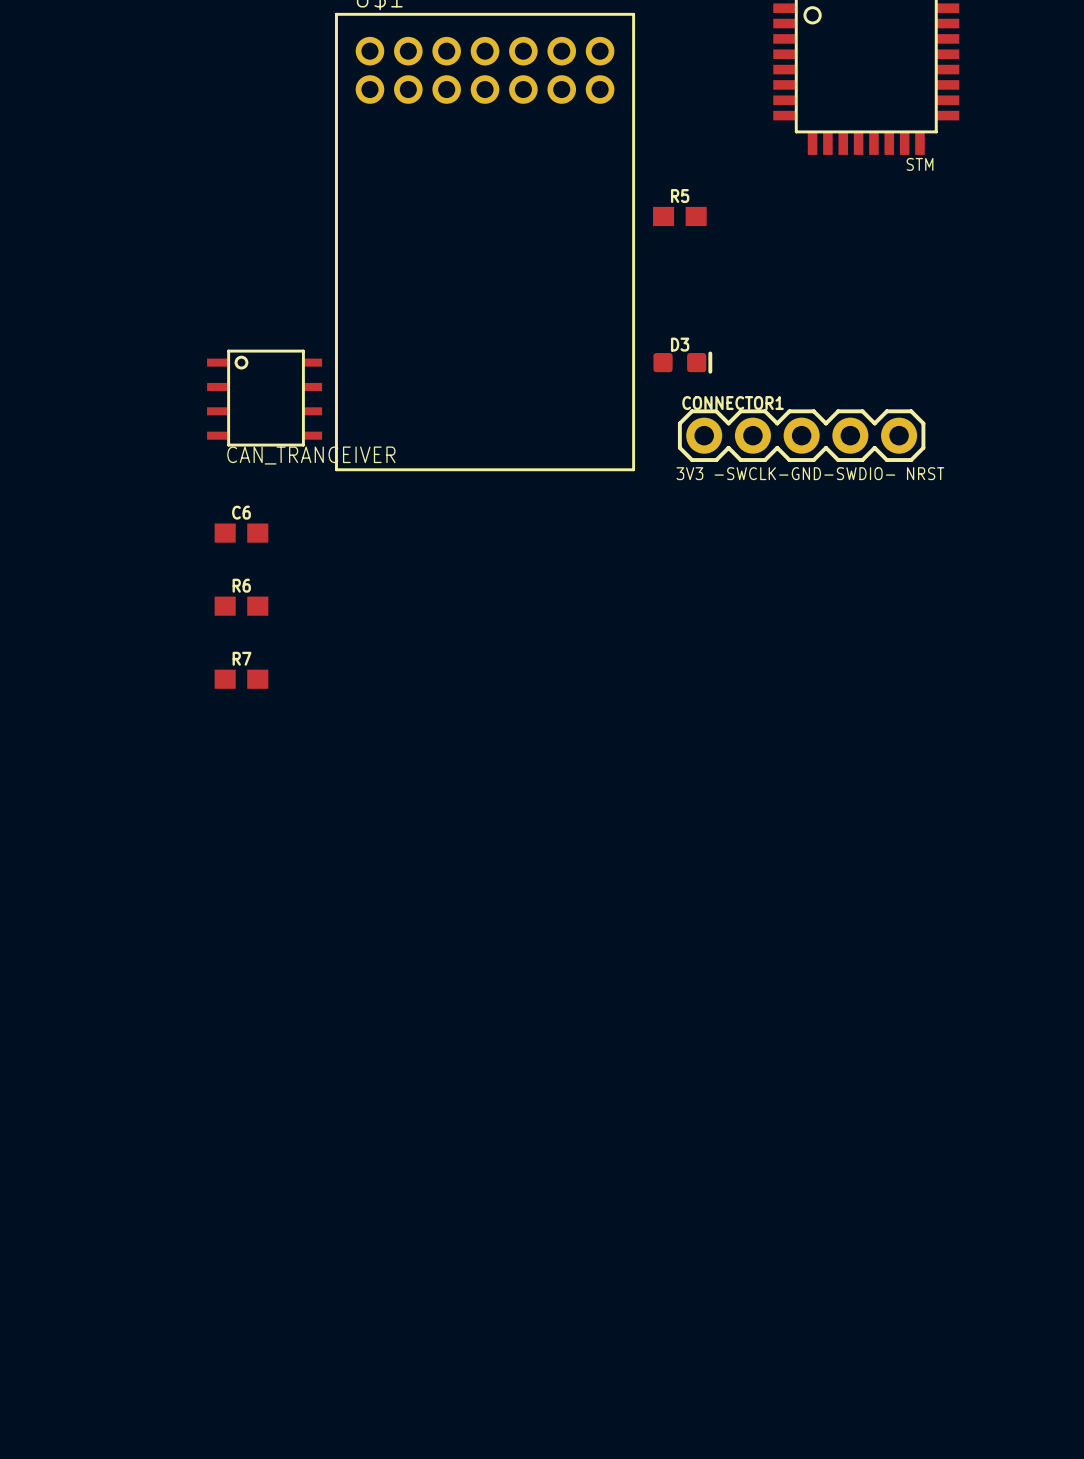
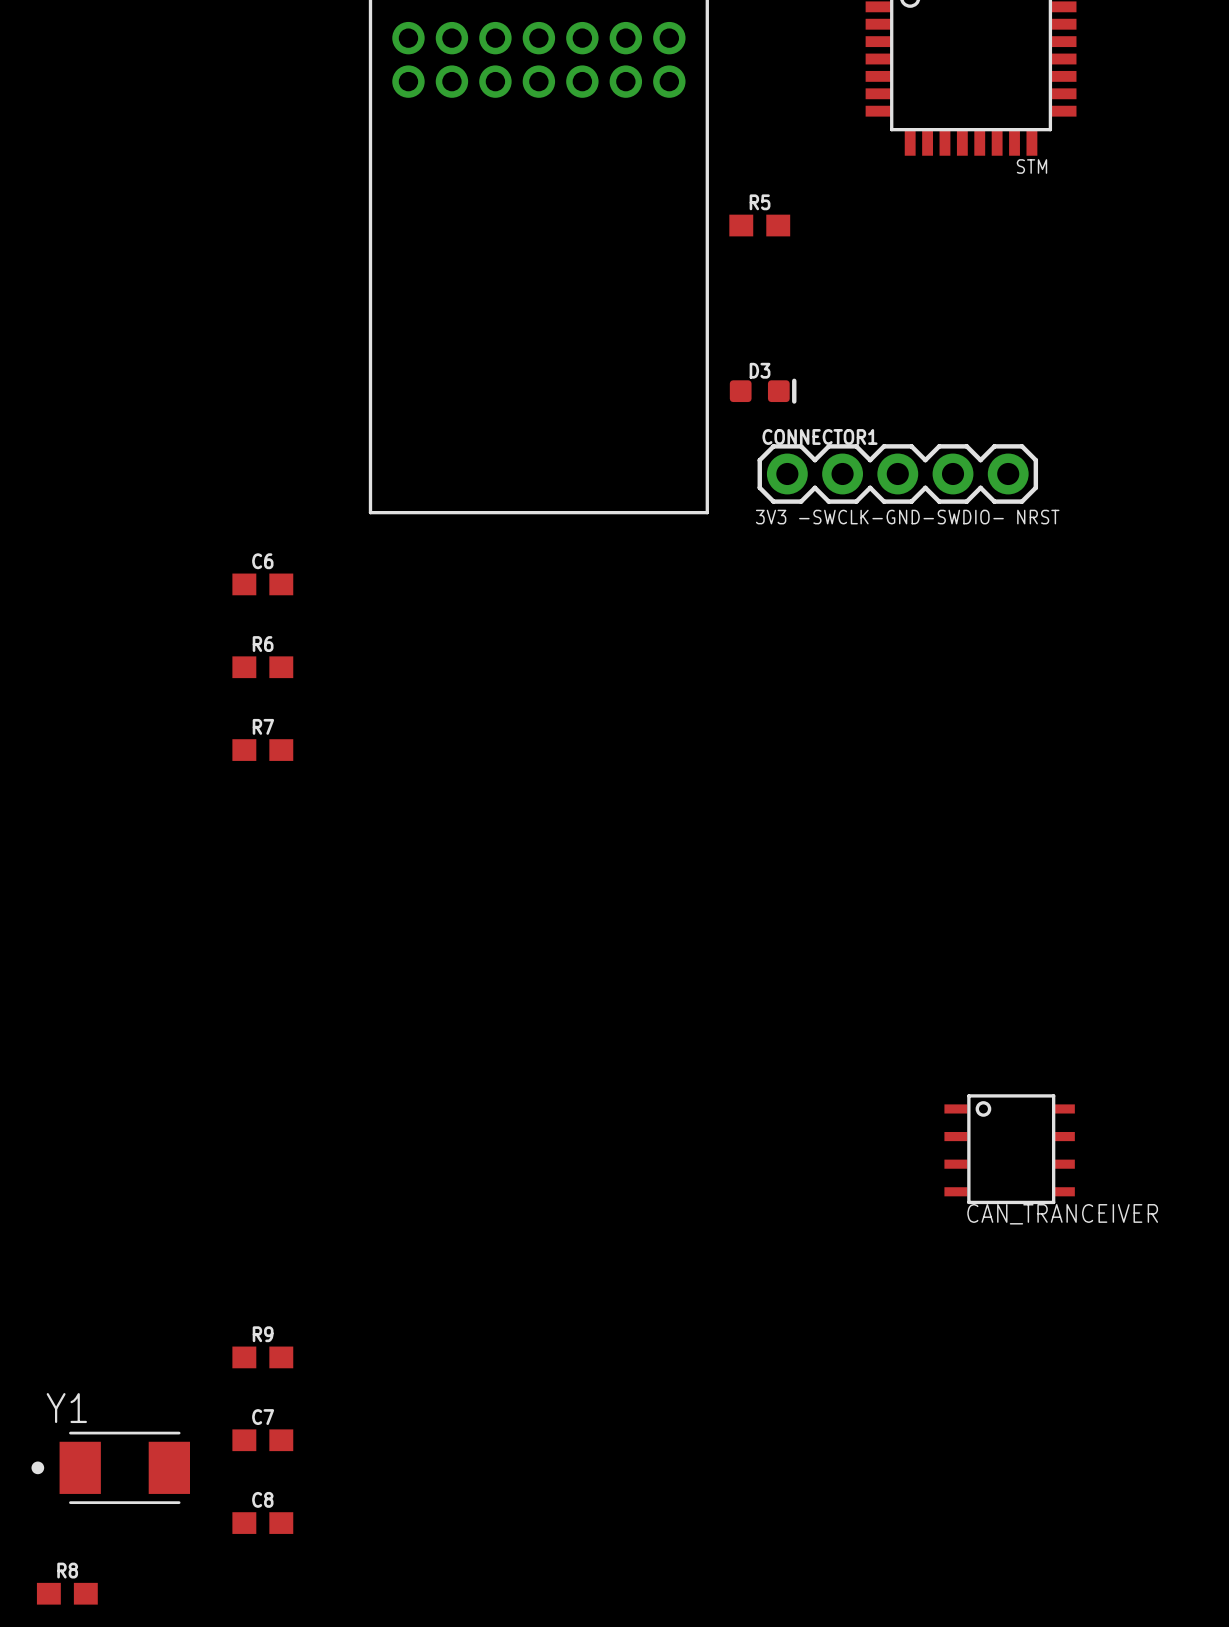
CAN_TRANCEIVER: (264, 398) -> none
CAN_TRANCEIVER: none -> (1009, 1149)
R9: none -> (262, 1357)
C7: none -> (262, 1440)
Y1: none -> (110, 1467)
C8: none -> (262, 1523)
R8: none -> (67, 1593)

